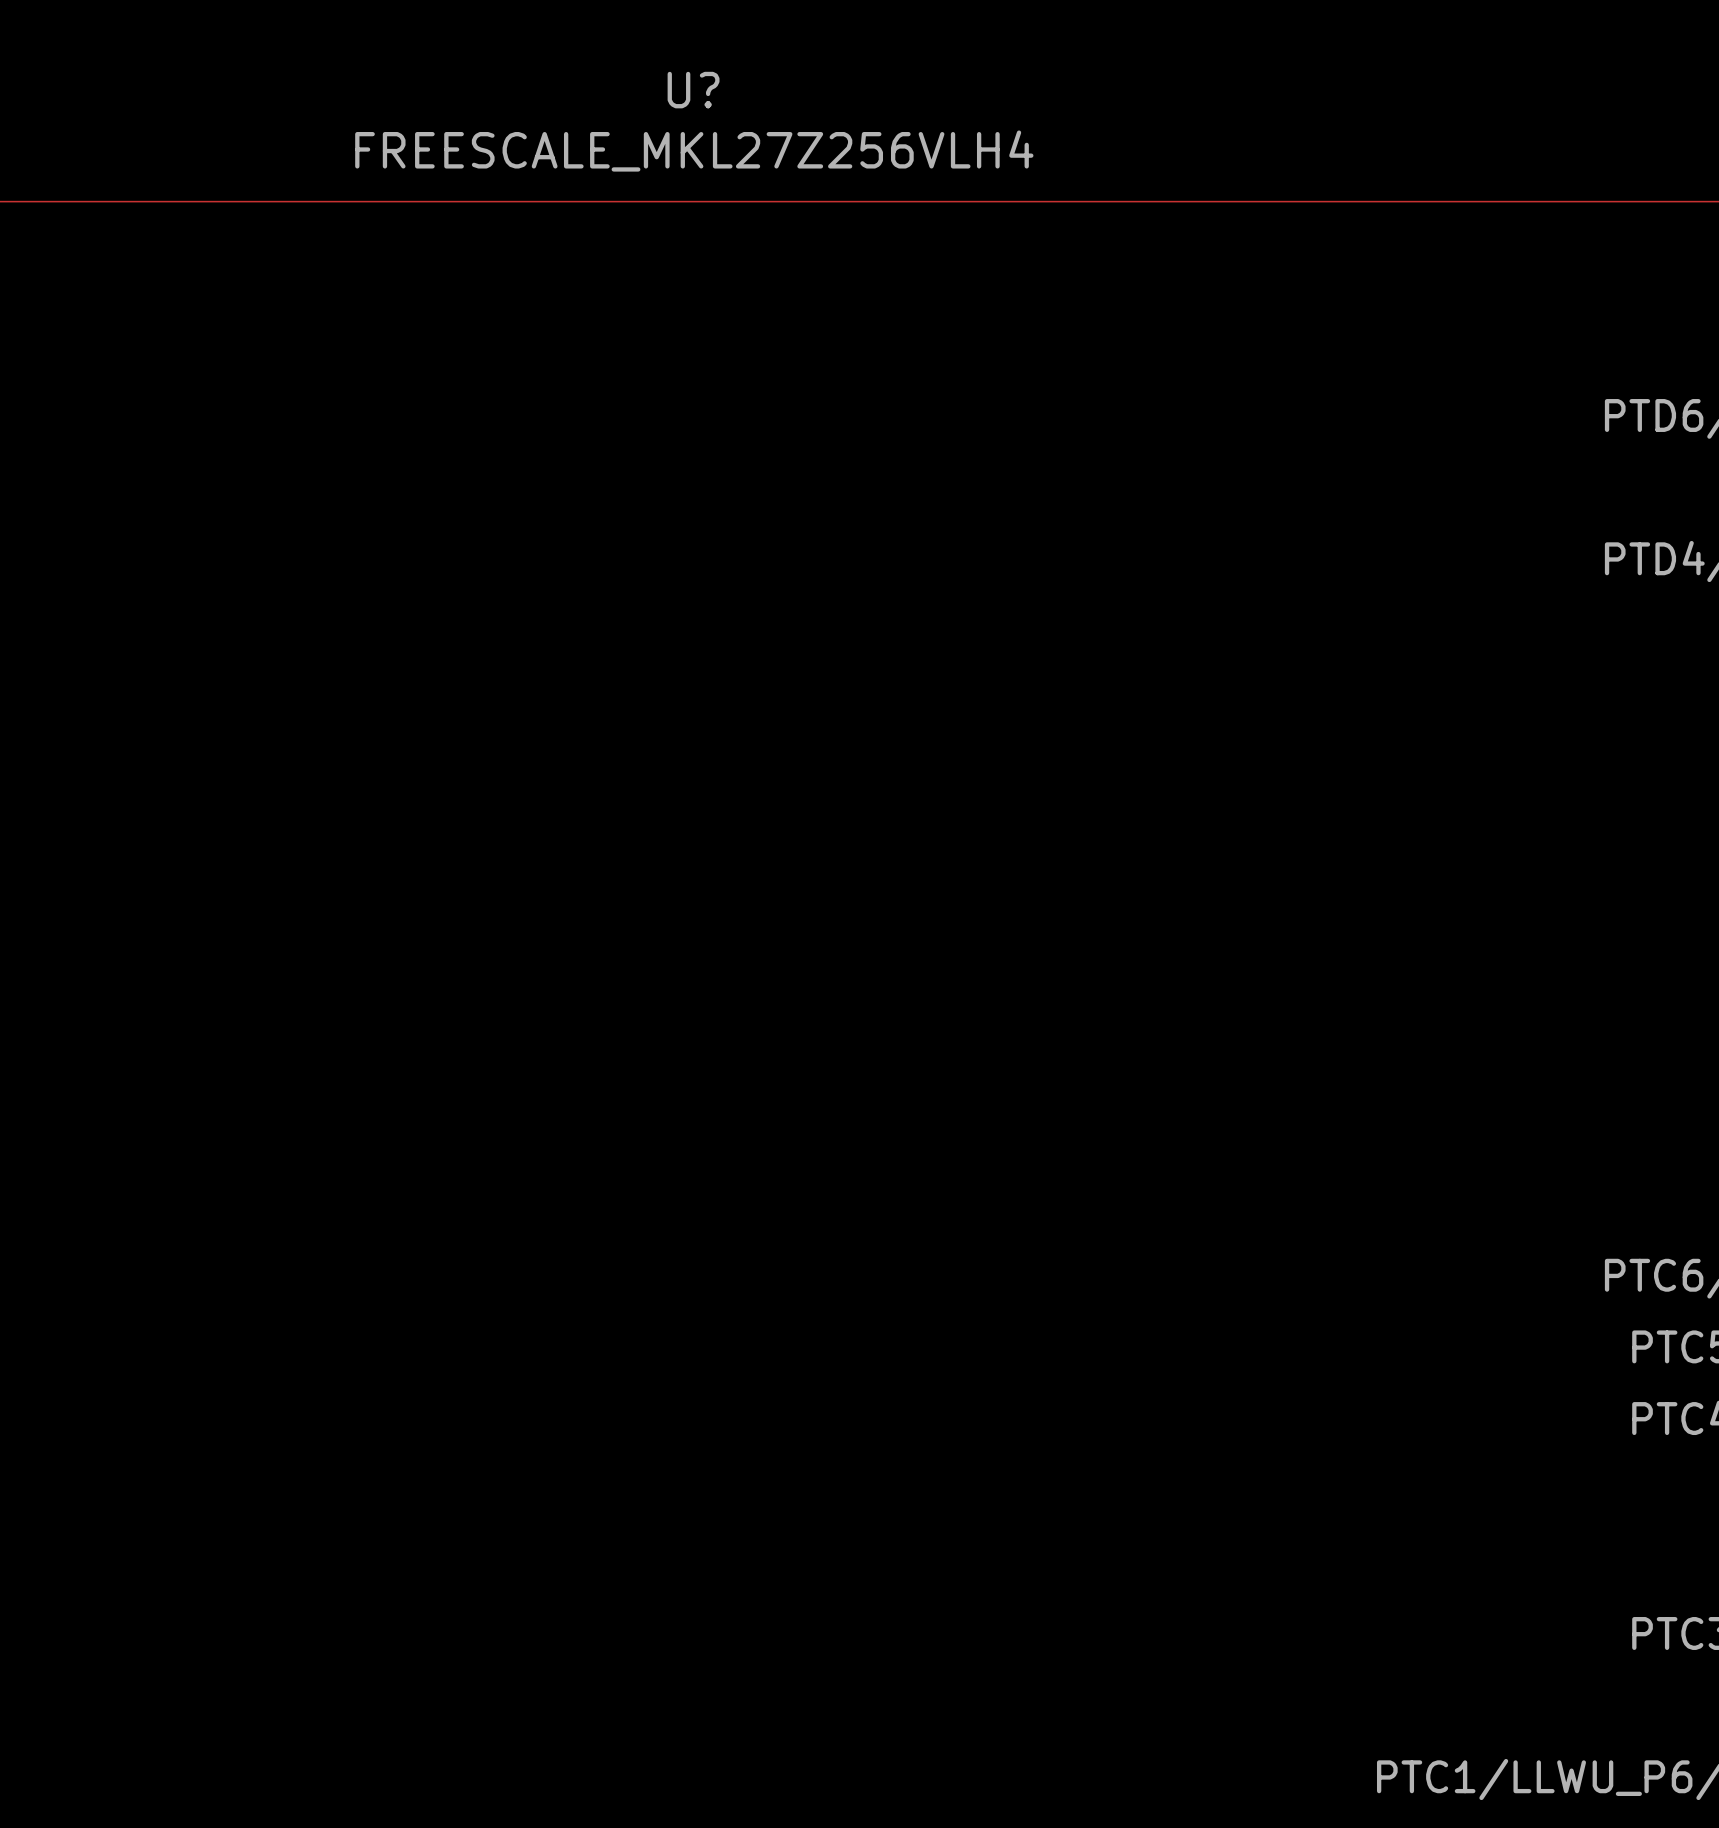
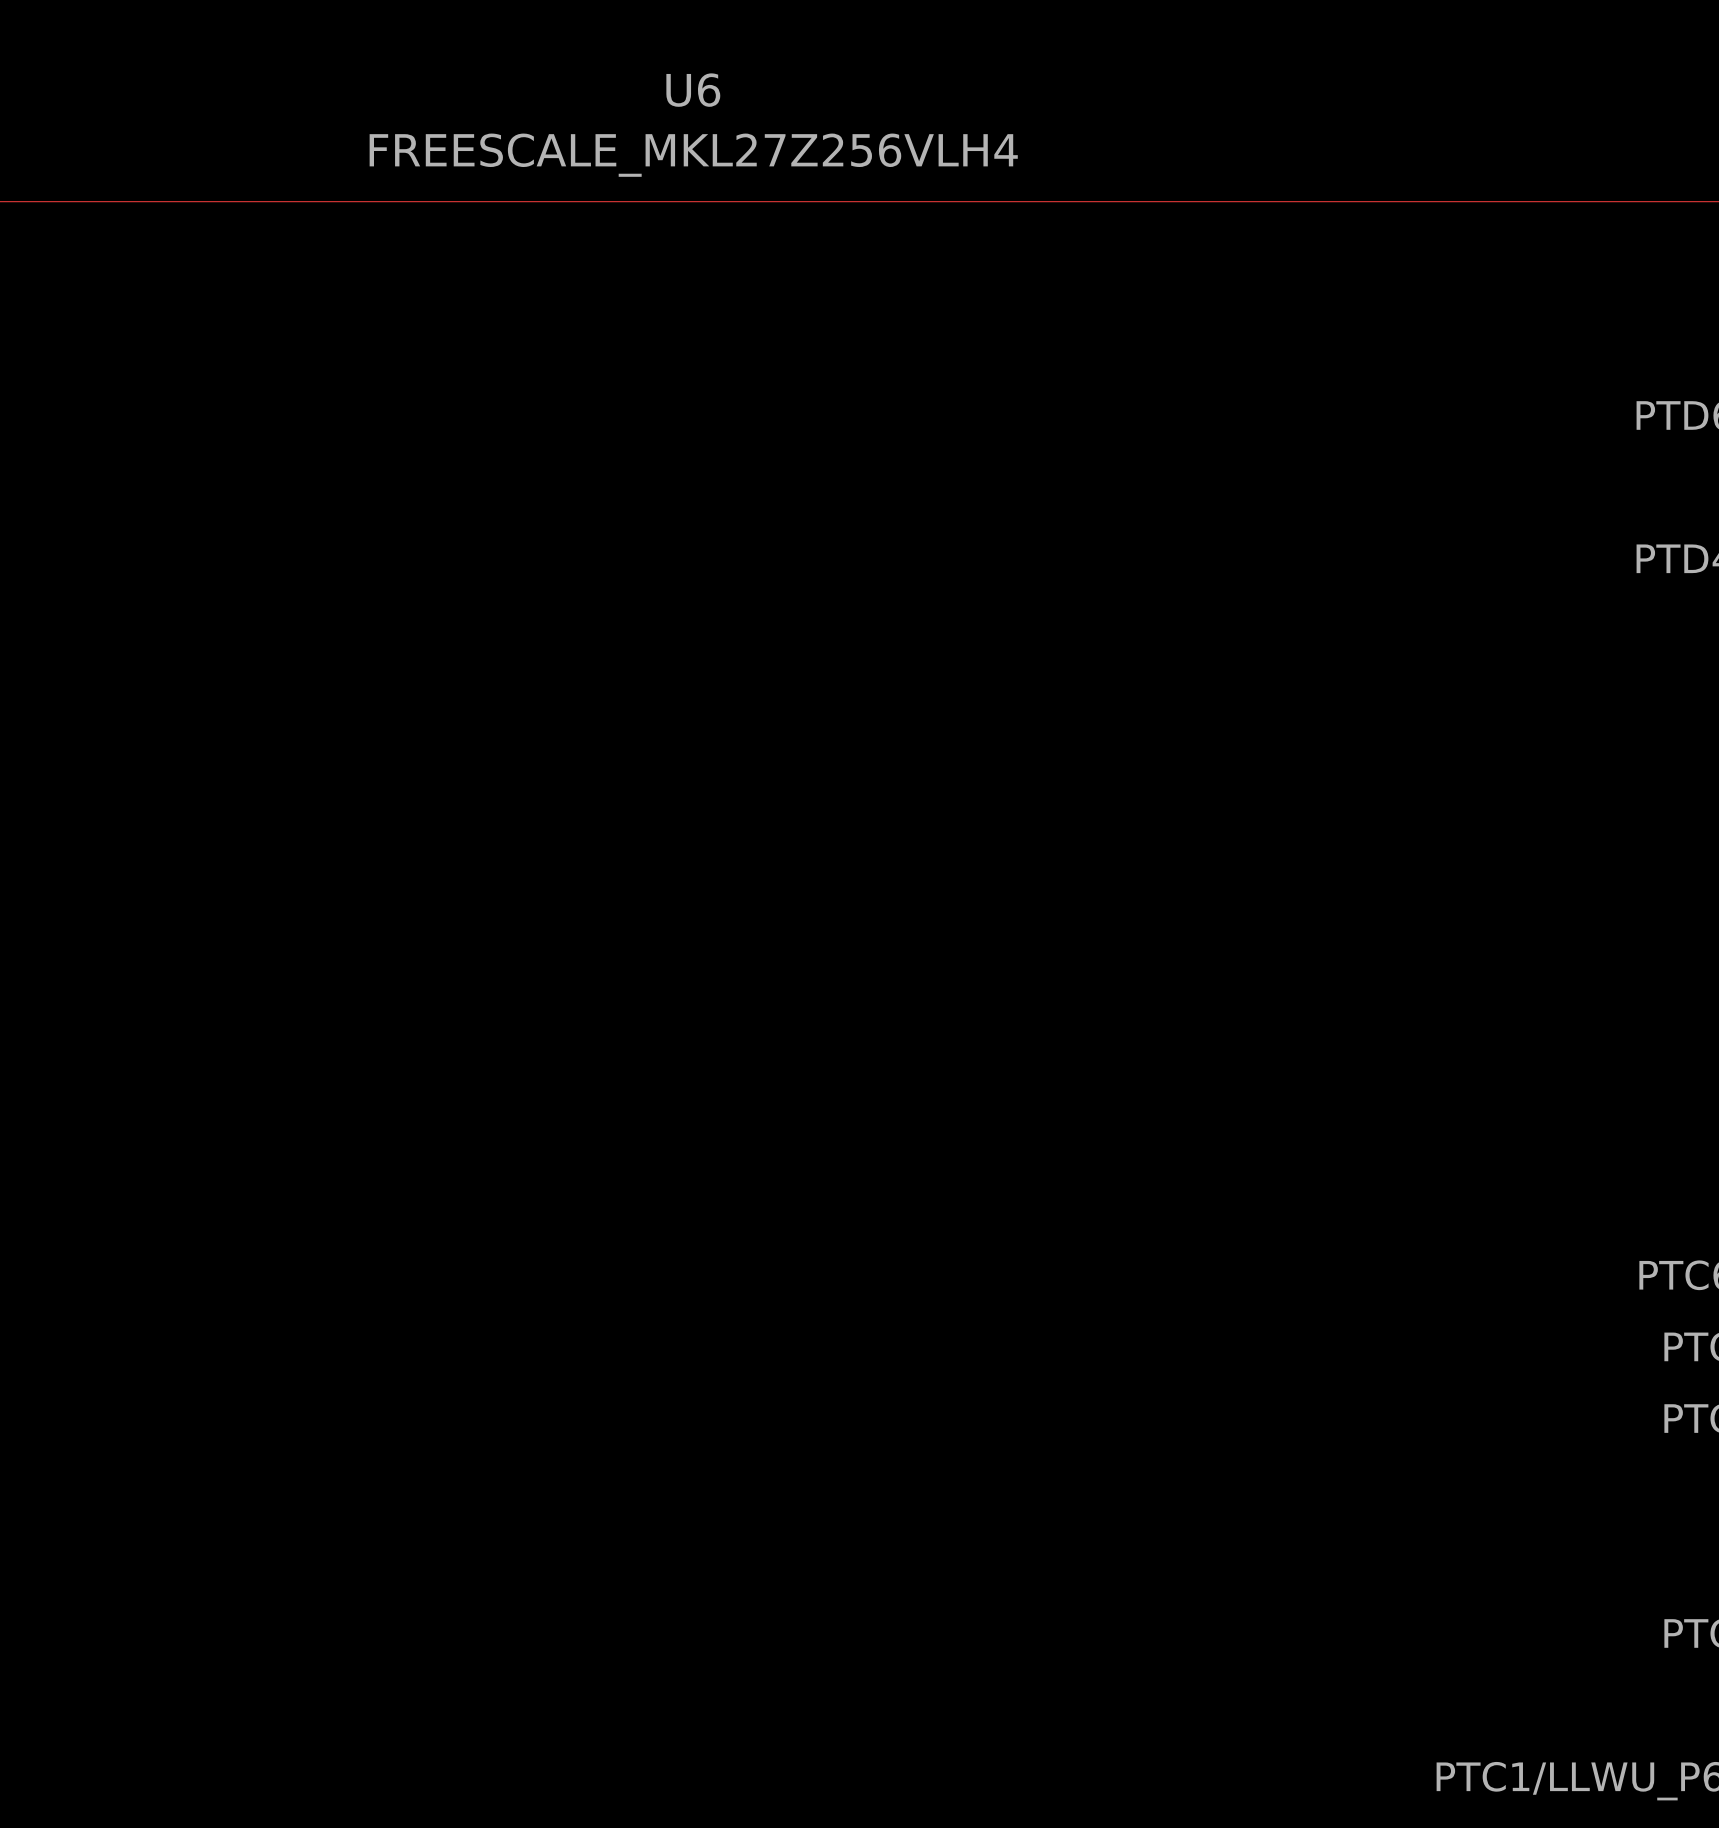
U? name: U? (693, 90) -> U6 (693, 90)

